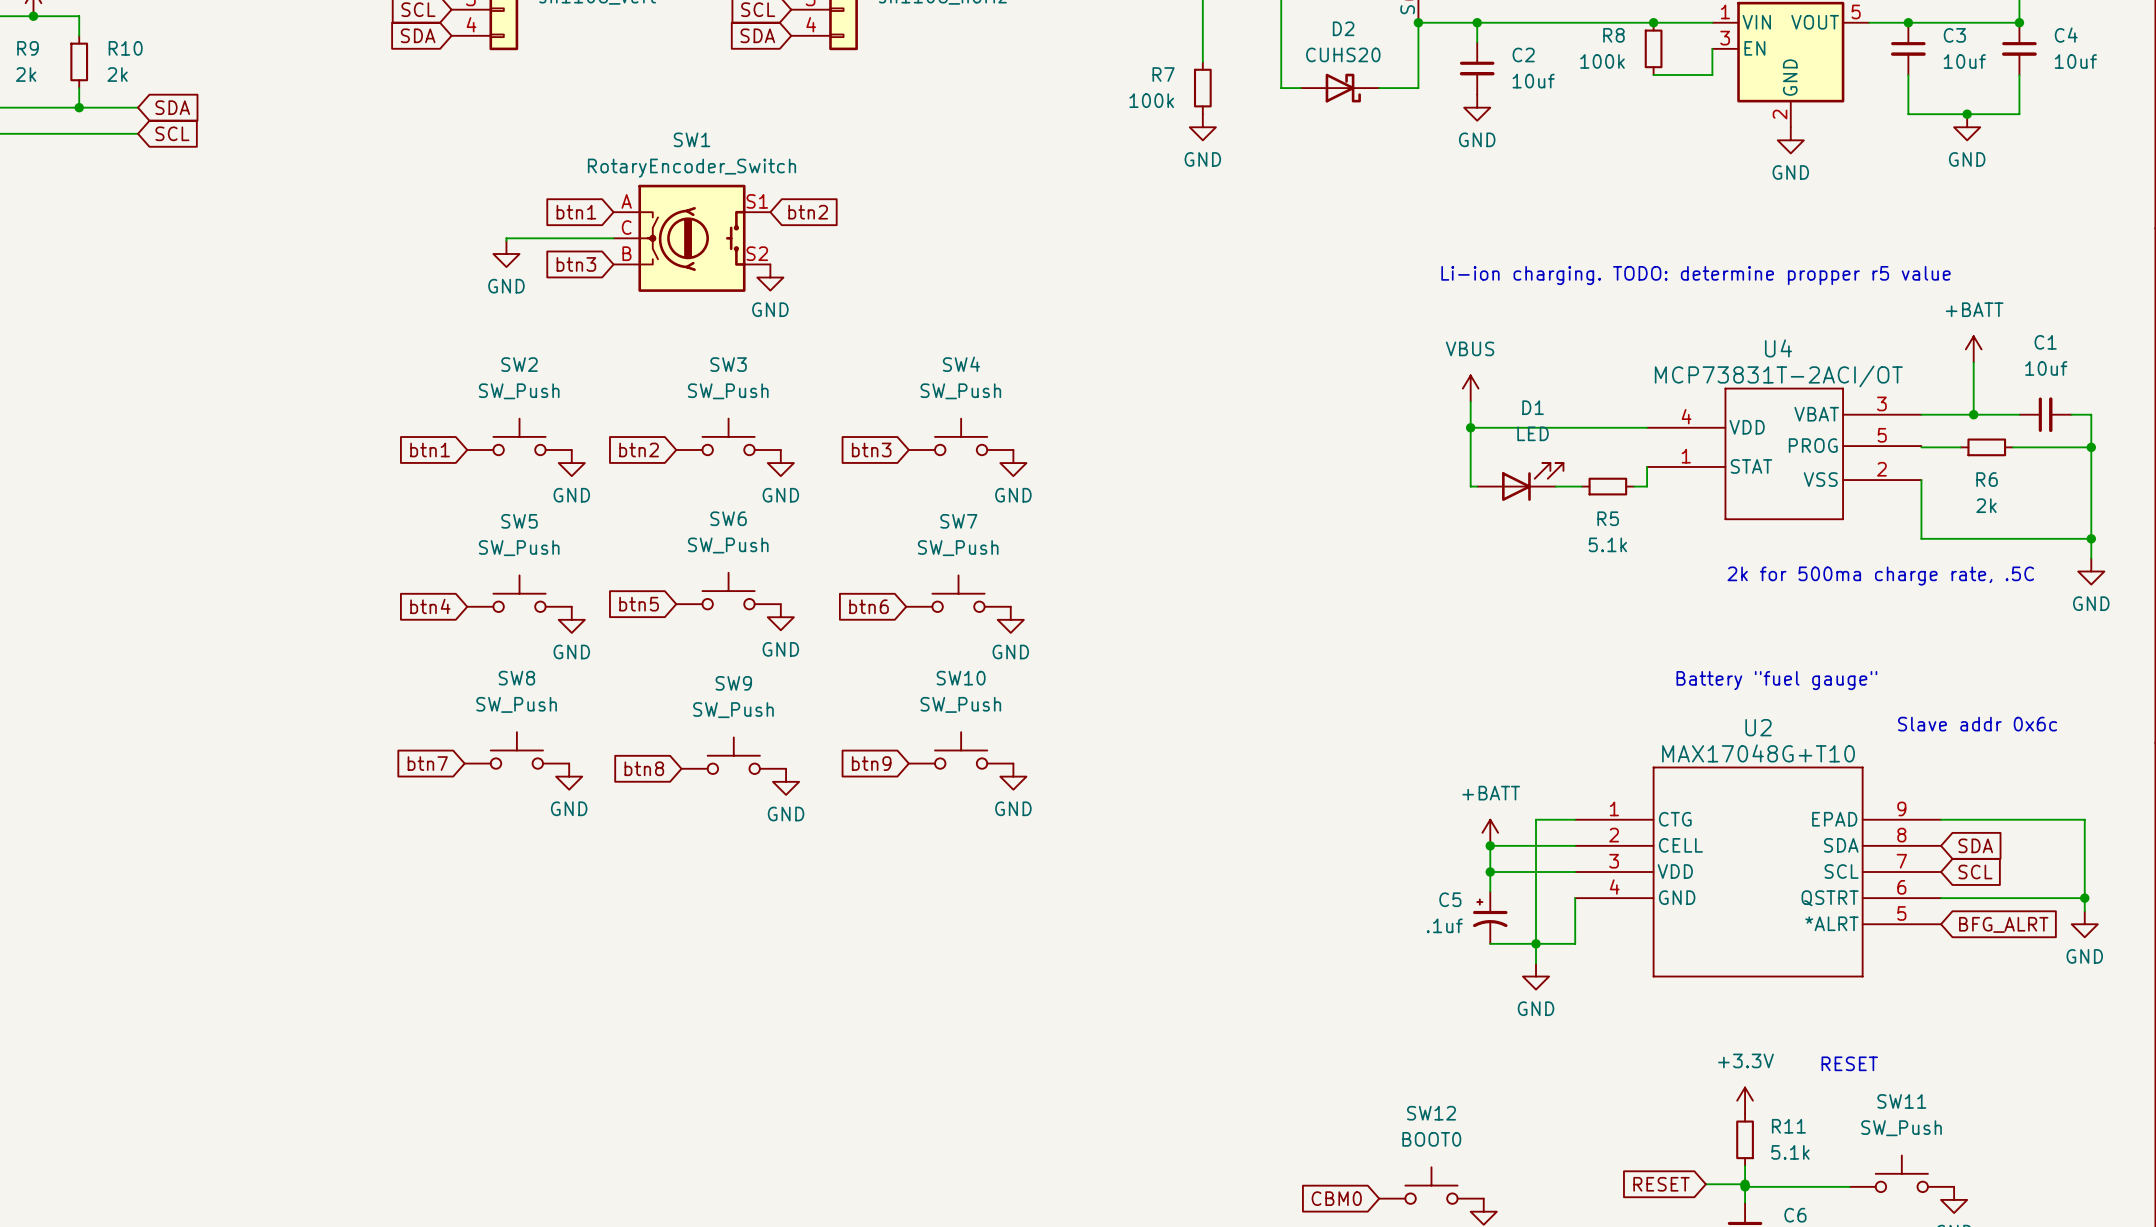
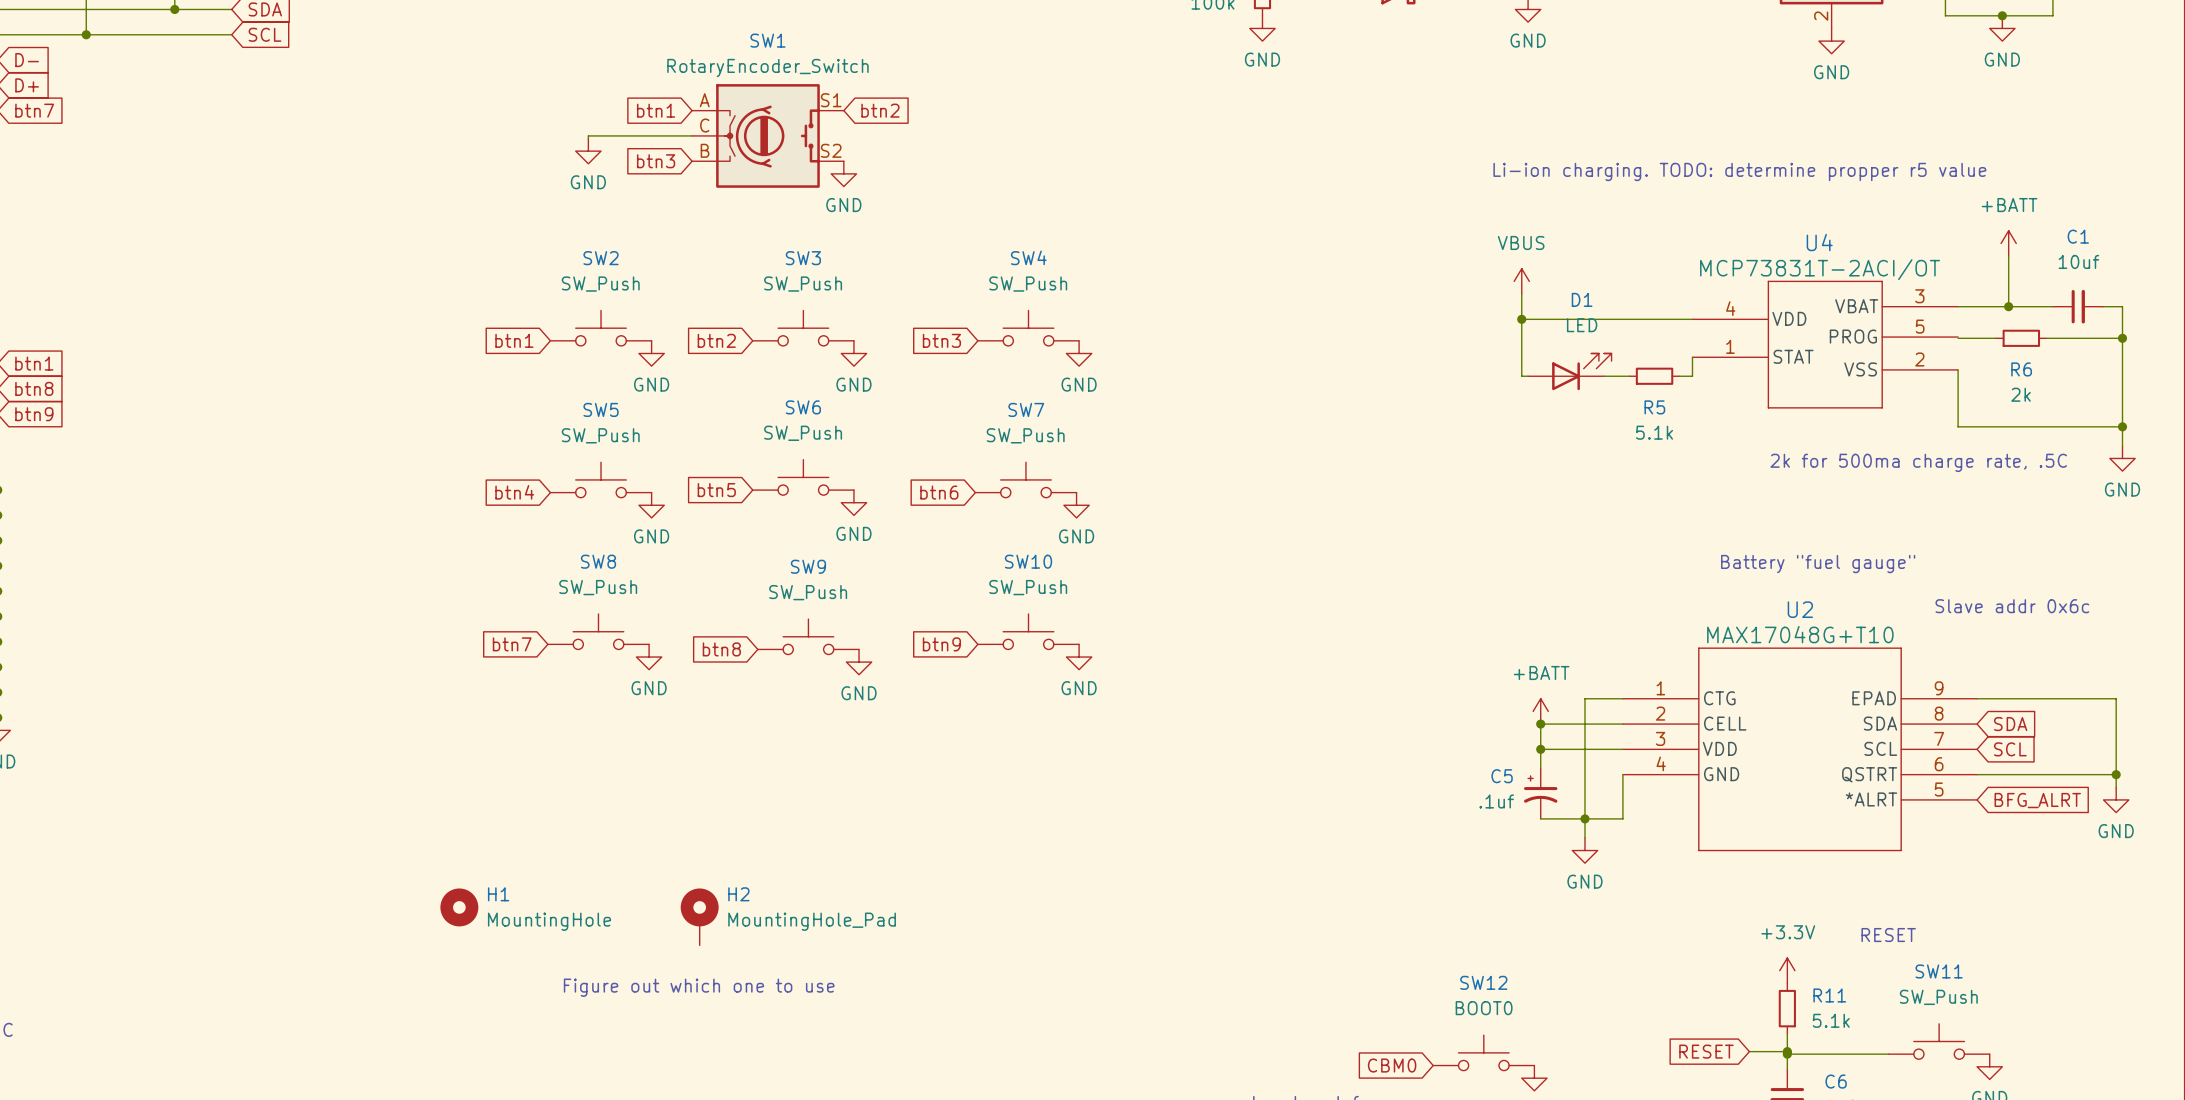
H1: none -> MountingHole (459, 907)
H2: none -> MountingHole_Pad (699, 916)
text: none -> Figure out which one to use (699, 987)

